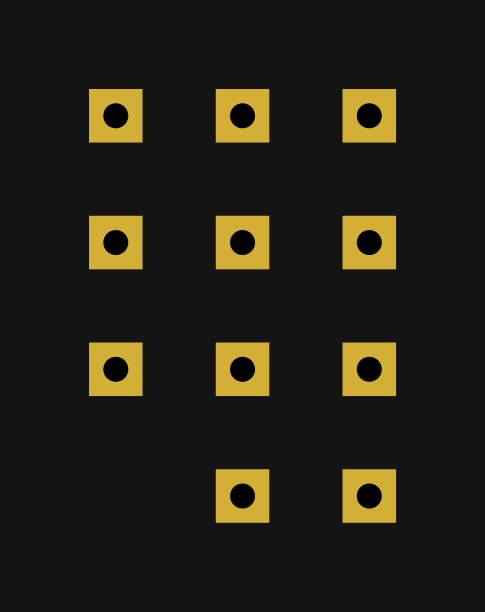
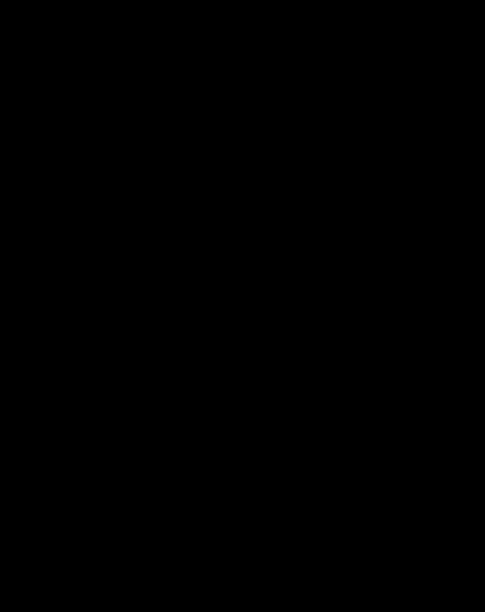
part: (115, 115) -> none
part: (242, 115) -> none
part: (369, 115) -> none
part: (115, 242) -> none
part: (242, 242) -> none
part: (369, 242) -> none
part: (115, 369) -> none
part: (242, 369) -> none
part: (369, 369) -> none
part: (242, 496) -> none
part: (369, 496) -> none

